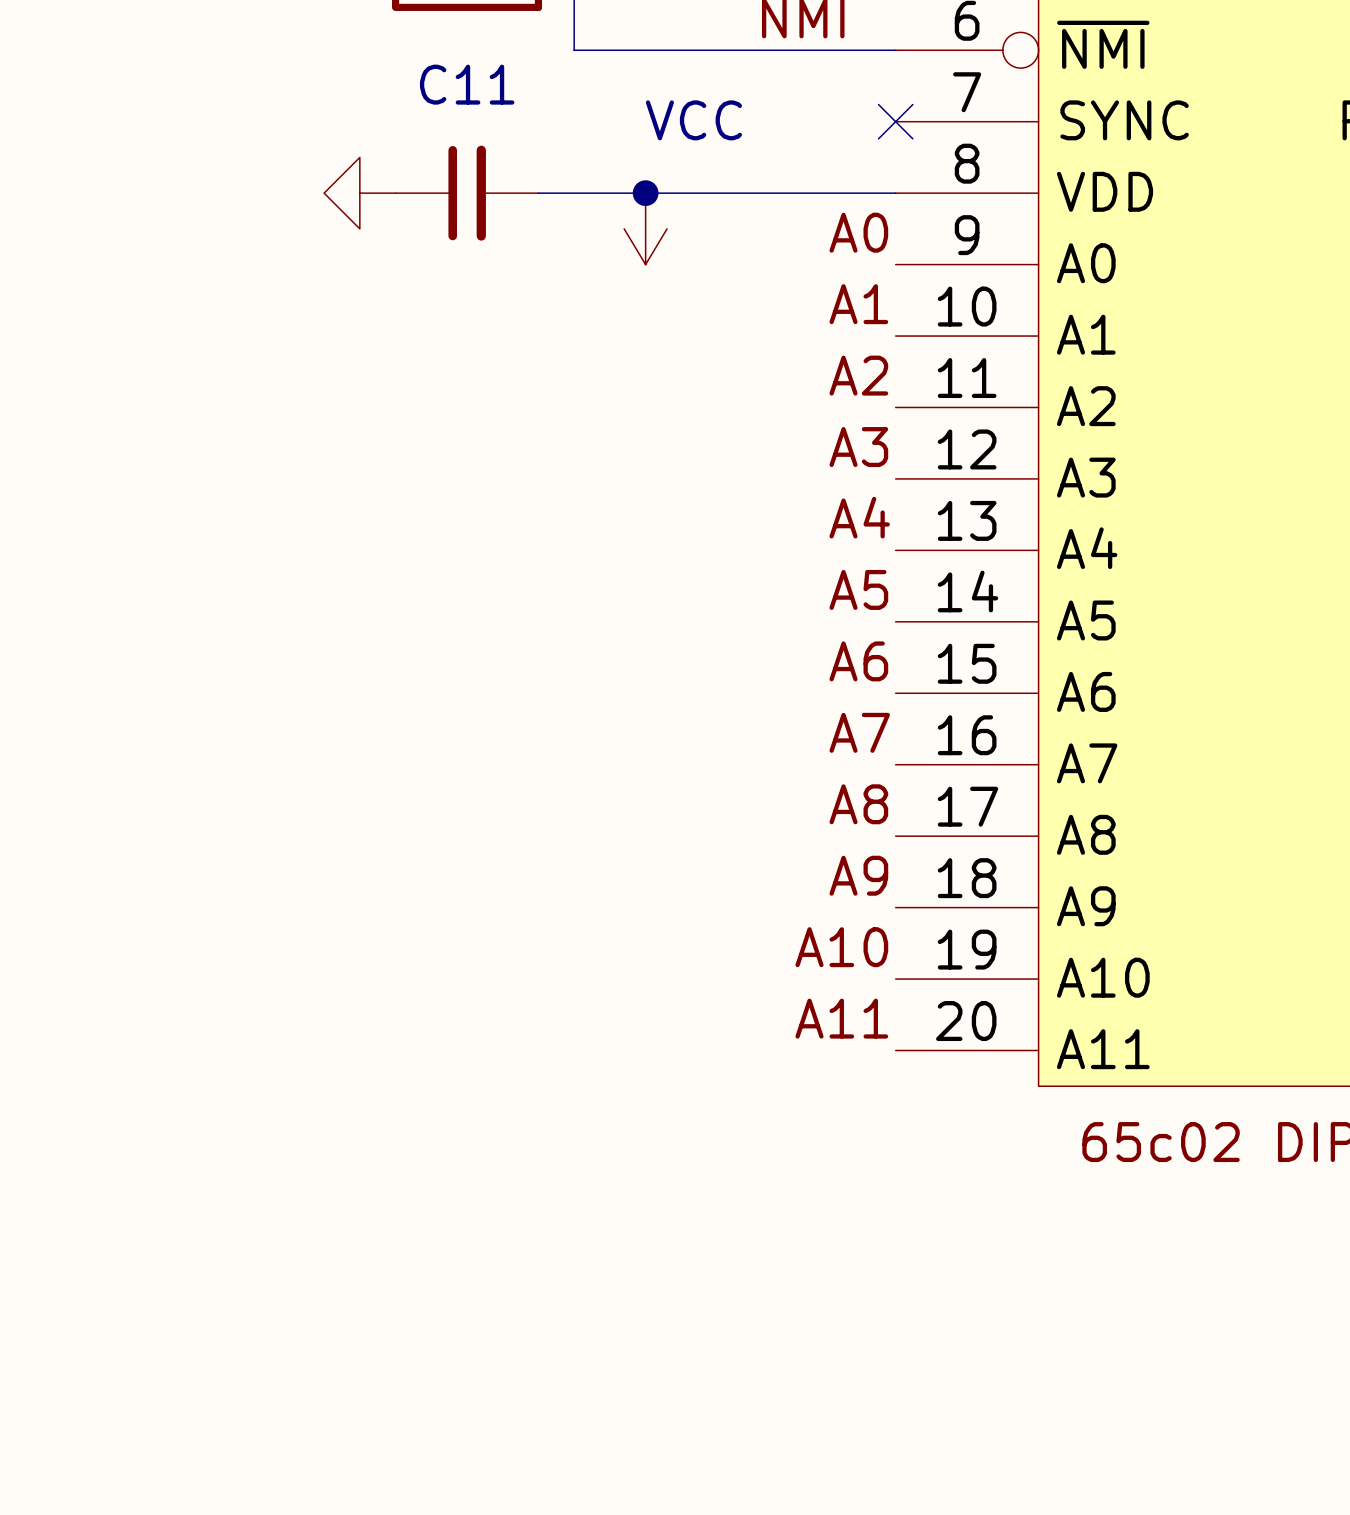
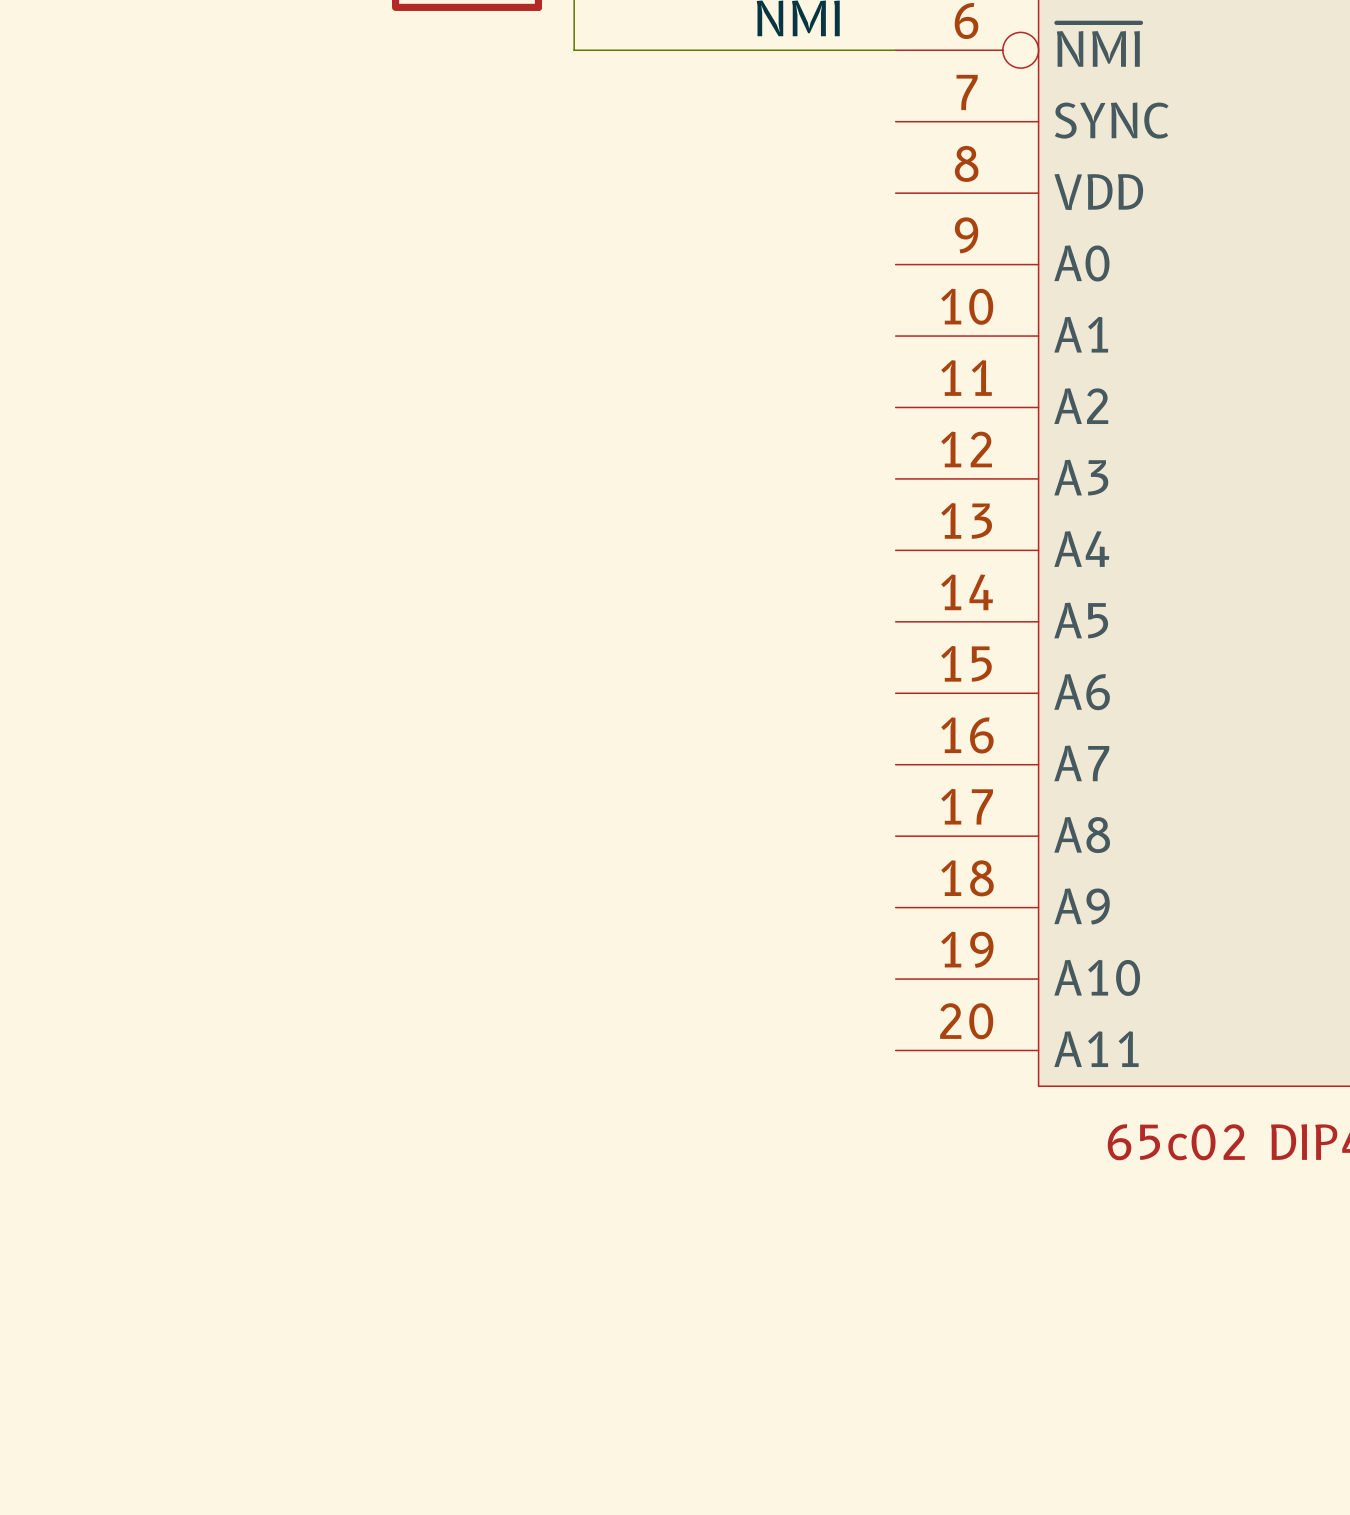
no-connect mark: (895, 121) -> none
power symbol: (359, 193) -> none
C11: (467, 193) -> none
wire: (538, 193) (895, 193) -> none
junction: (645, 193) -> none
power symbol: VCC (645, 228) -> none
label: A0 (858, 232) -> none
label: A1 (858, 304) -> none
label: A2 (858, 375) -> none
label: A3 (858, 447) -> none
label: A4 (859, 517) -> none
label: A5 (858, 589) -> none
label: A6 (858, 661) -> none
label: A7 (859, 732) -> none
label: A8 (858, 804) -> none
label: A9 (858, 875) -> none
label: A10 (841, 947) -> none
label: A11 (841, 1018) -> none

